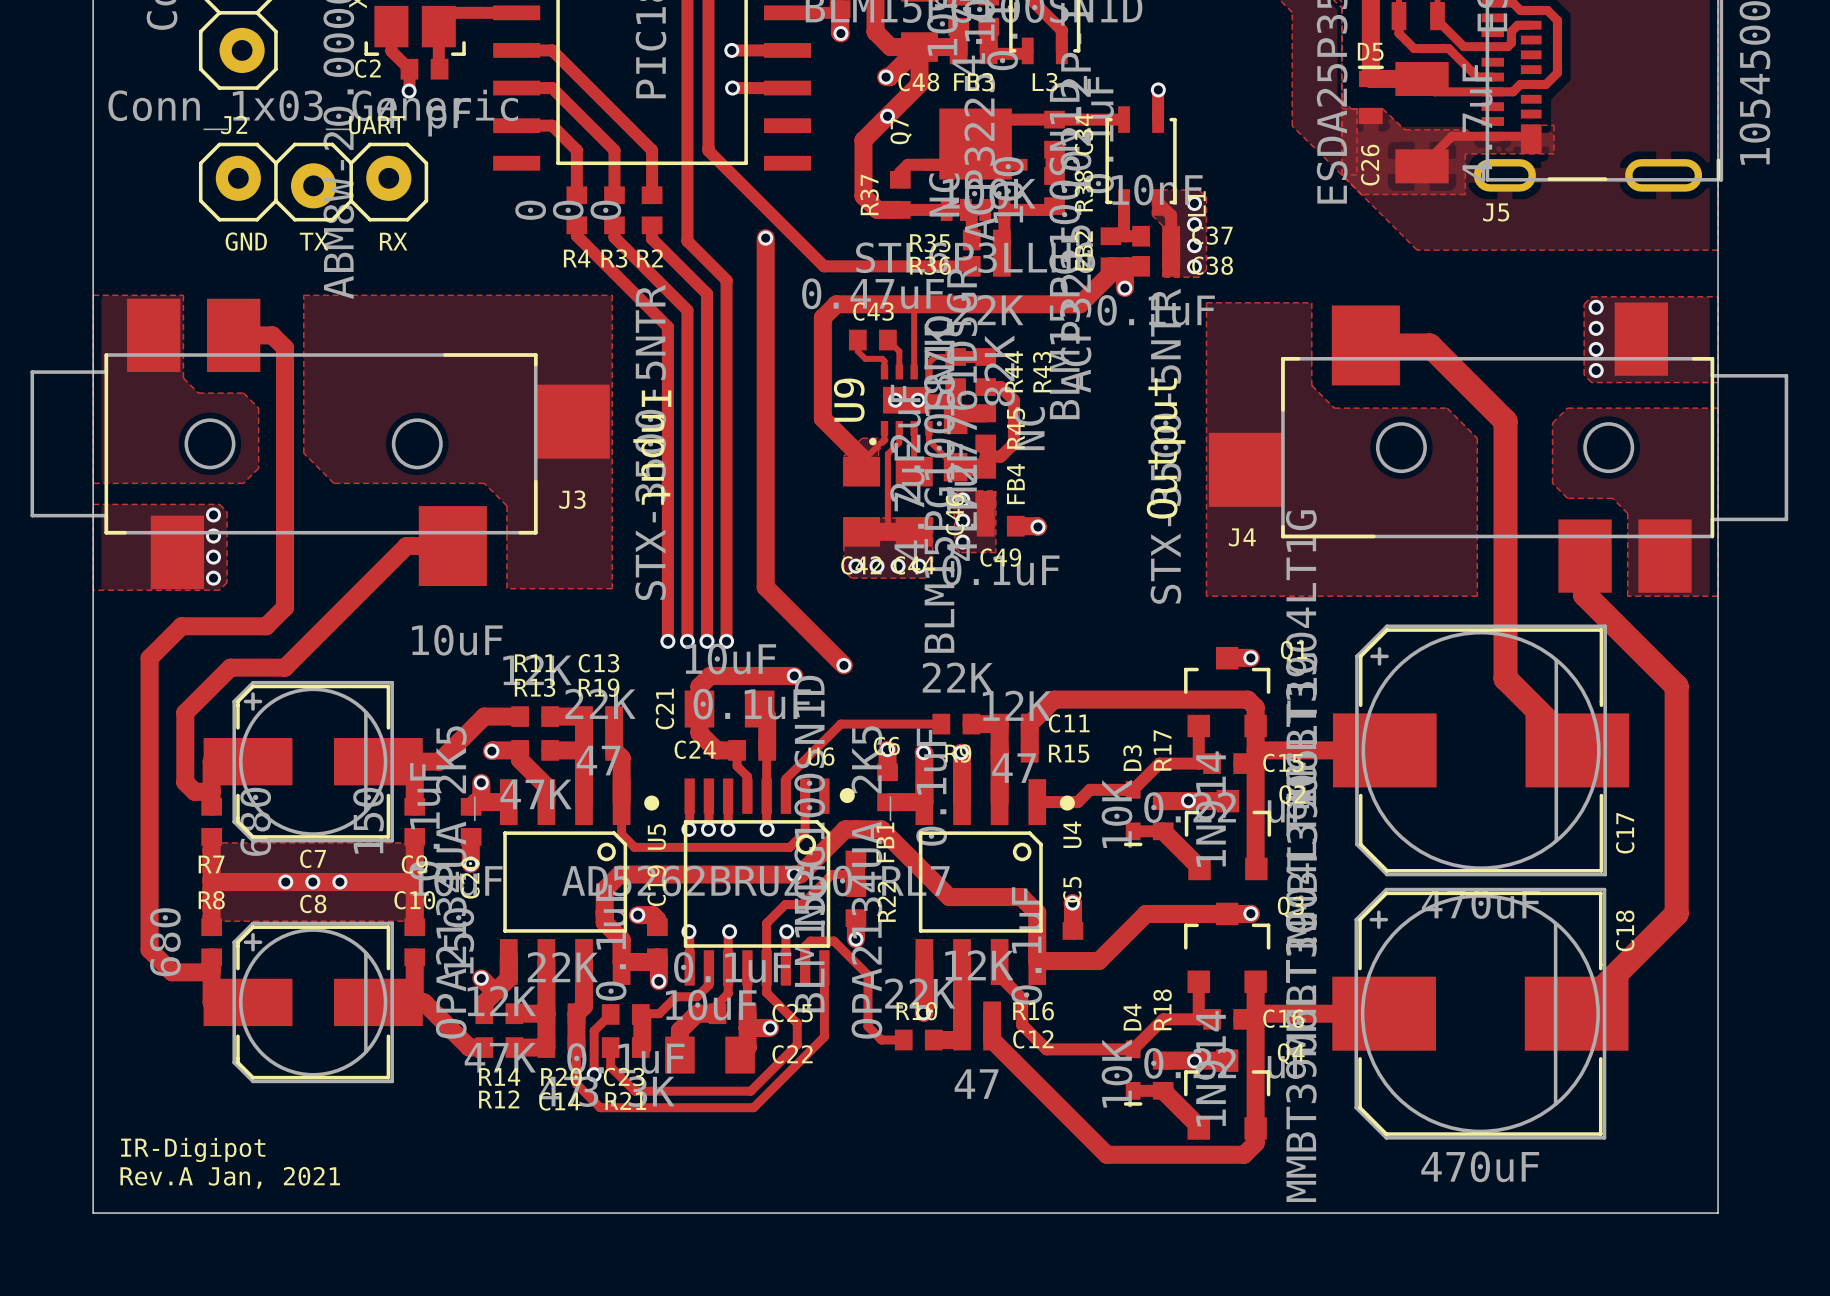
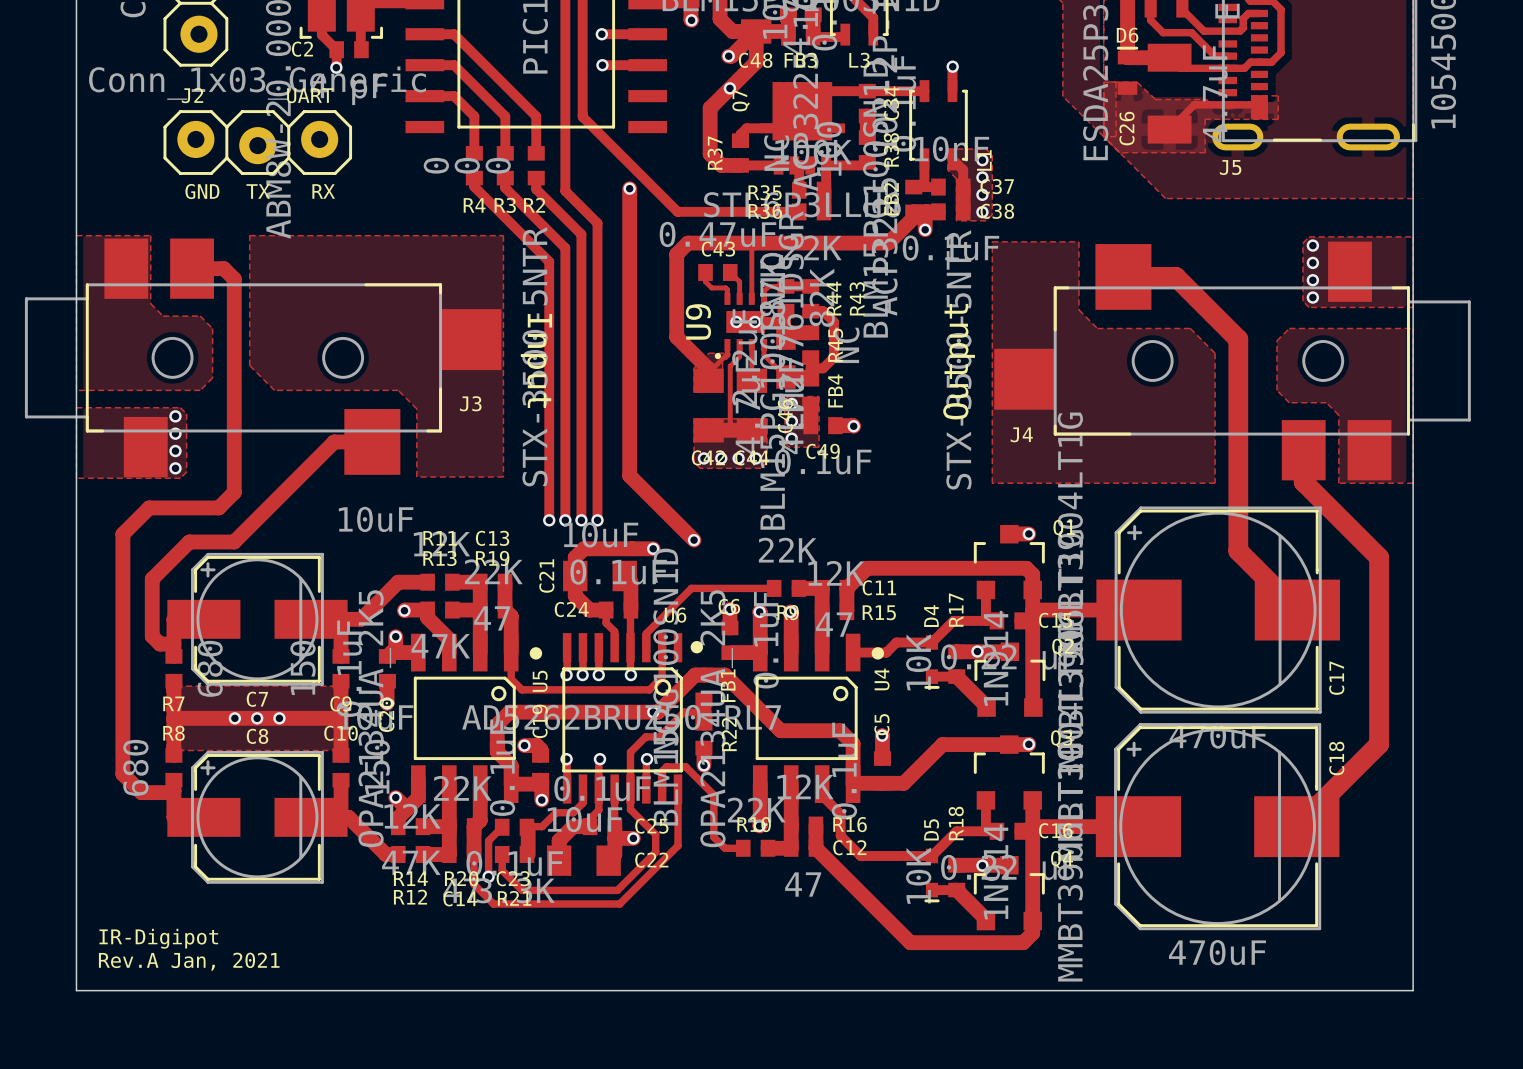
D5 name: D5 (1370, 51) -> D6 (1127, 35)
D3 name: D3 (1132, 758) -> D4 (931, 616)
D4 name: D4 (1132, 1017) -> D5 (931, 829)

